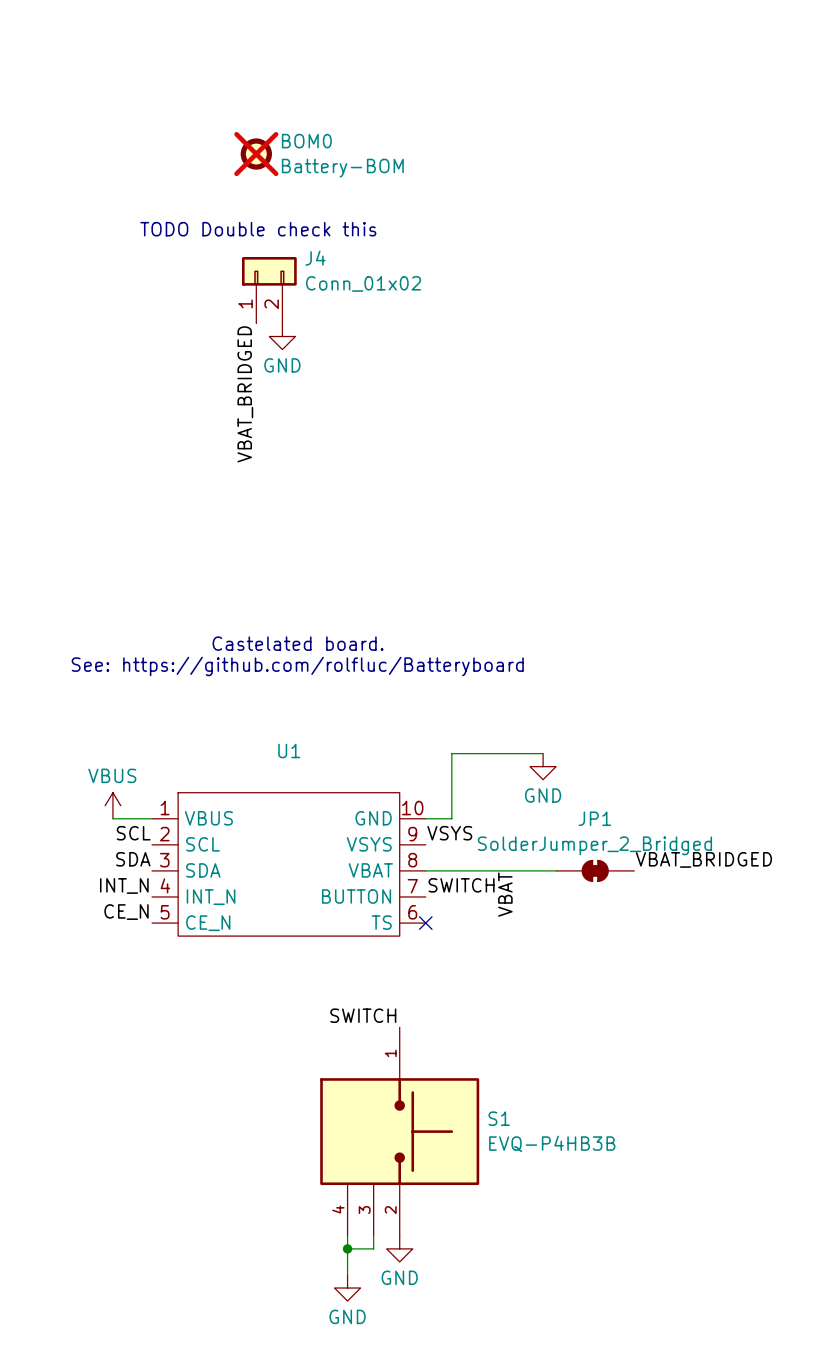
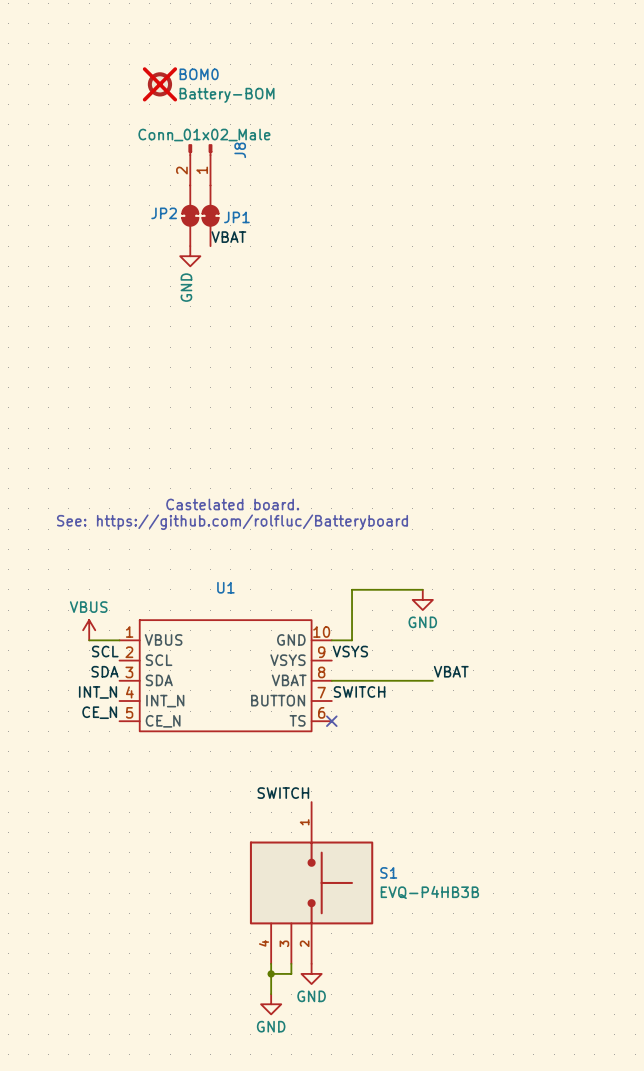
BOM0 position: (256, 154) -> (159, 84)
J8: none -> Conn_01x02_Male (200, 164)
text: TODO Double check this (258, 229) -> none
JP2: none -> (190, 215)
J4: Conn_01x02 (269, 290) -> none
label: none -> VBAT (228, 237)
power symbol position: GND (282, 336) -> GND (190, 256)
power symbol text rotation: 0° (282, 365) -> 90° counterclockwise (186, 287)
label: VBAT_BRIDGED (245, 394) -> none
JP1 value: SolderJumper_2_Bridged (594, 845) -> none
label: VBAT_BRIDGED (703, 859) -> none
JP1 rotation: 0° (595, 870) -> 90° clockwise (210, 215)
JP1 position: (595, 870) -> (210, 215)
label rotation: 0° (505, 894) -> 90° clockwise (451, 671)
label position: VBAT (505, 894) -> VBAT (451, 671)

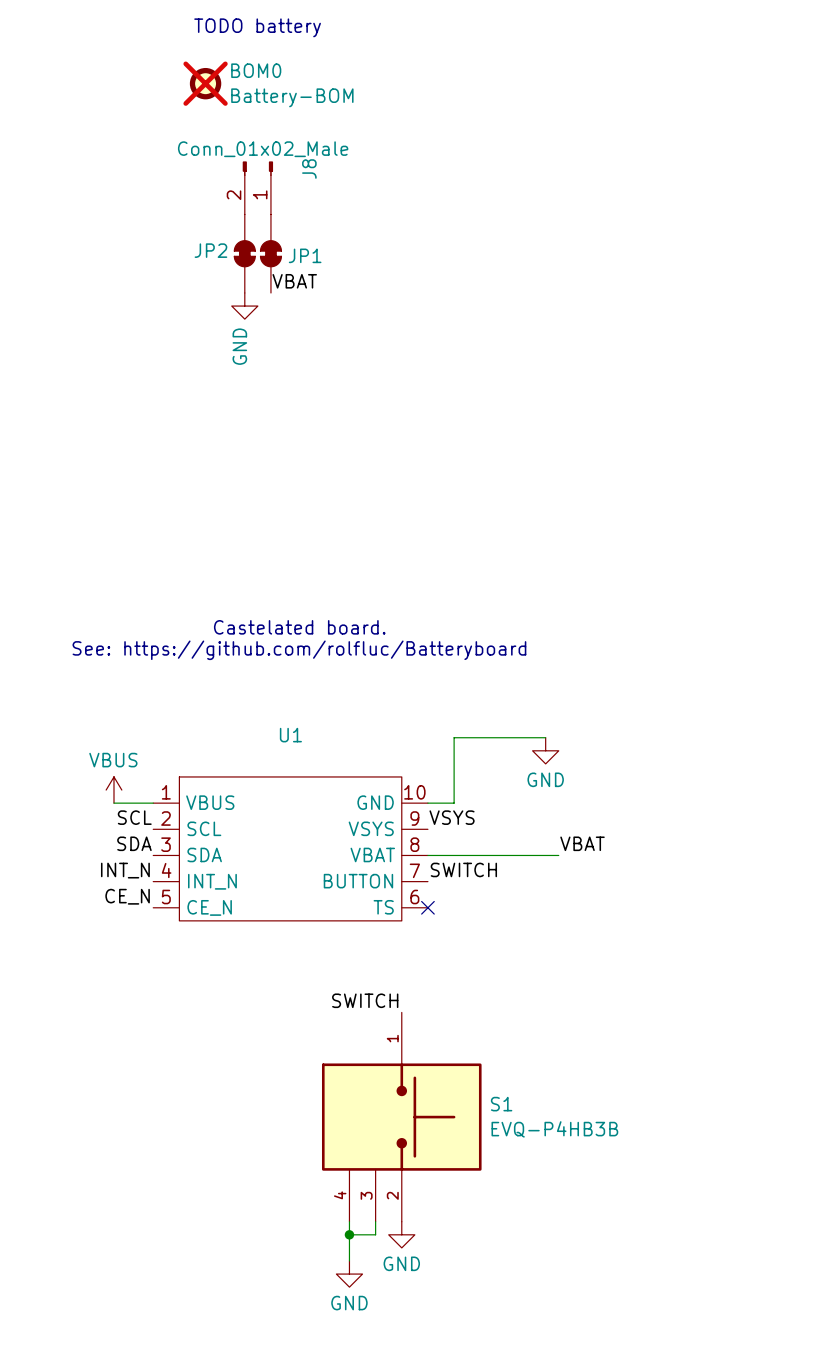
text: none -> TODO battery (257, 27)

